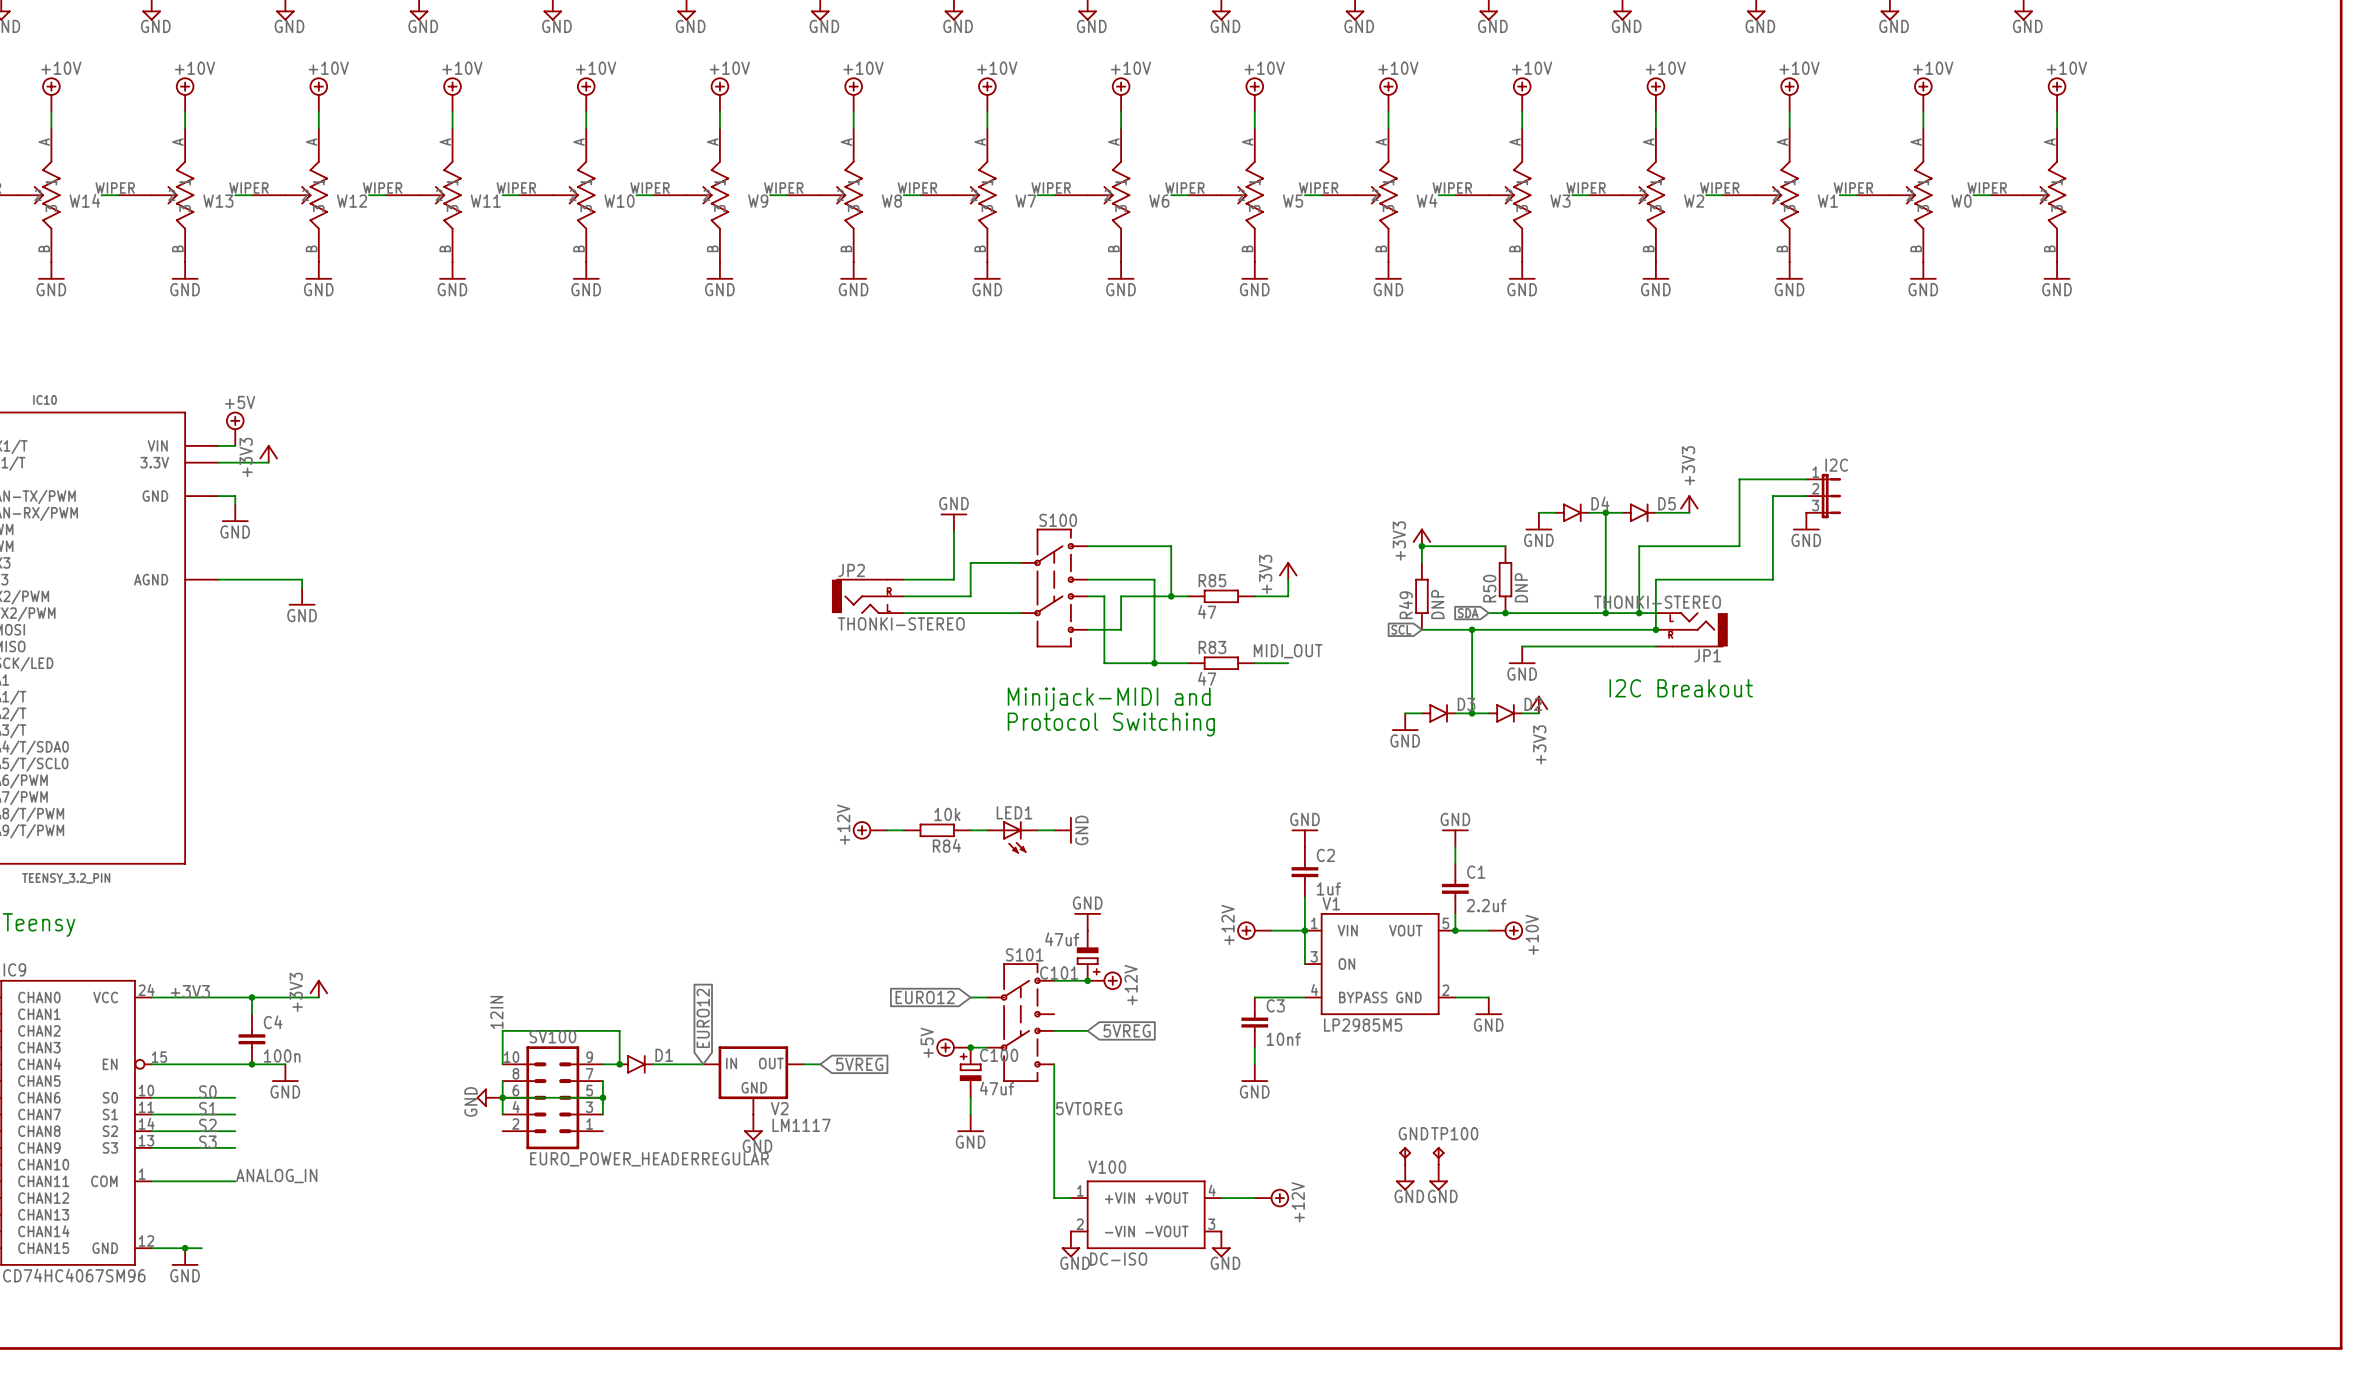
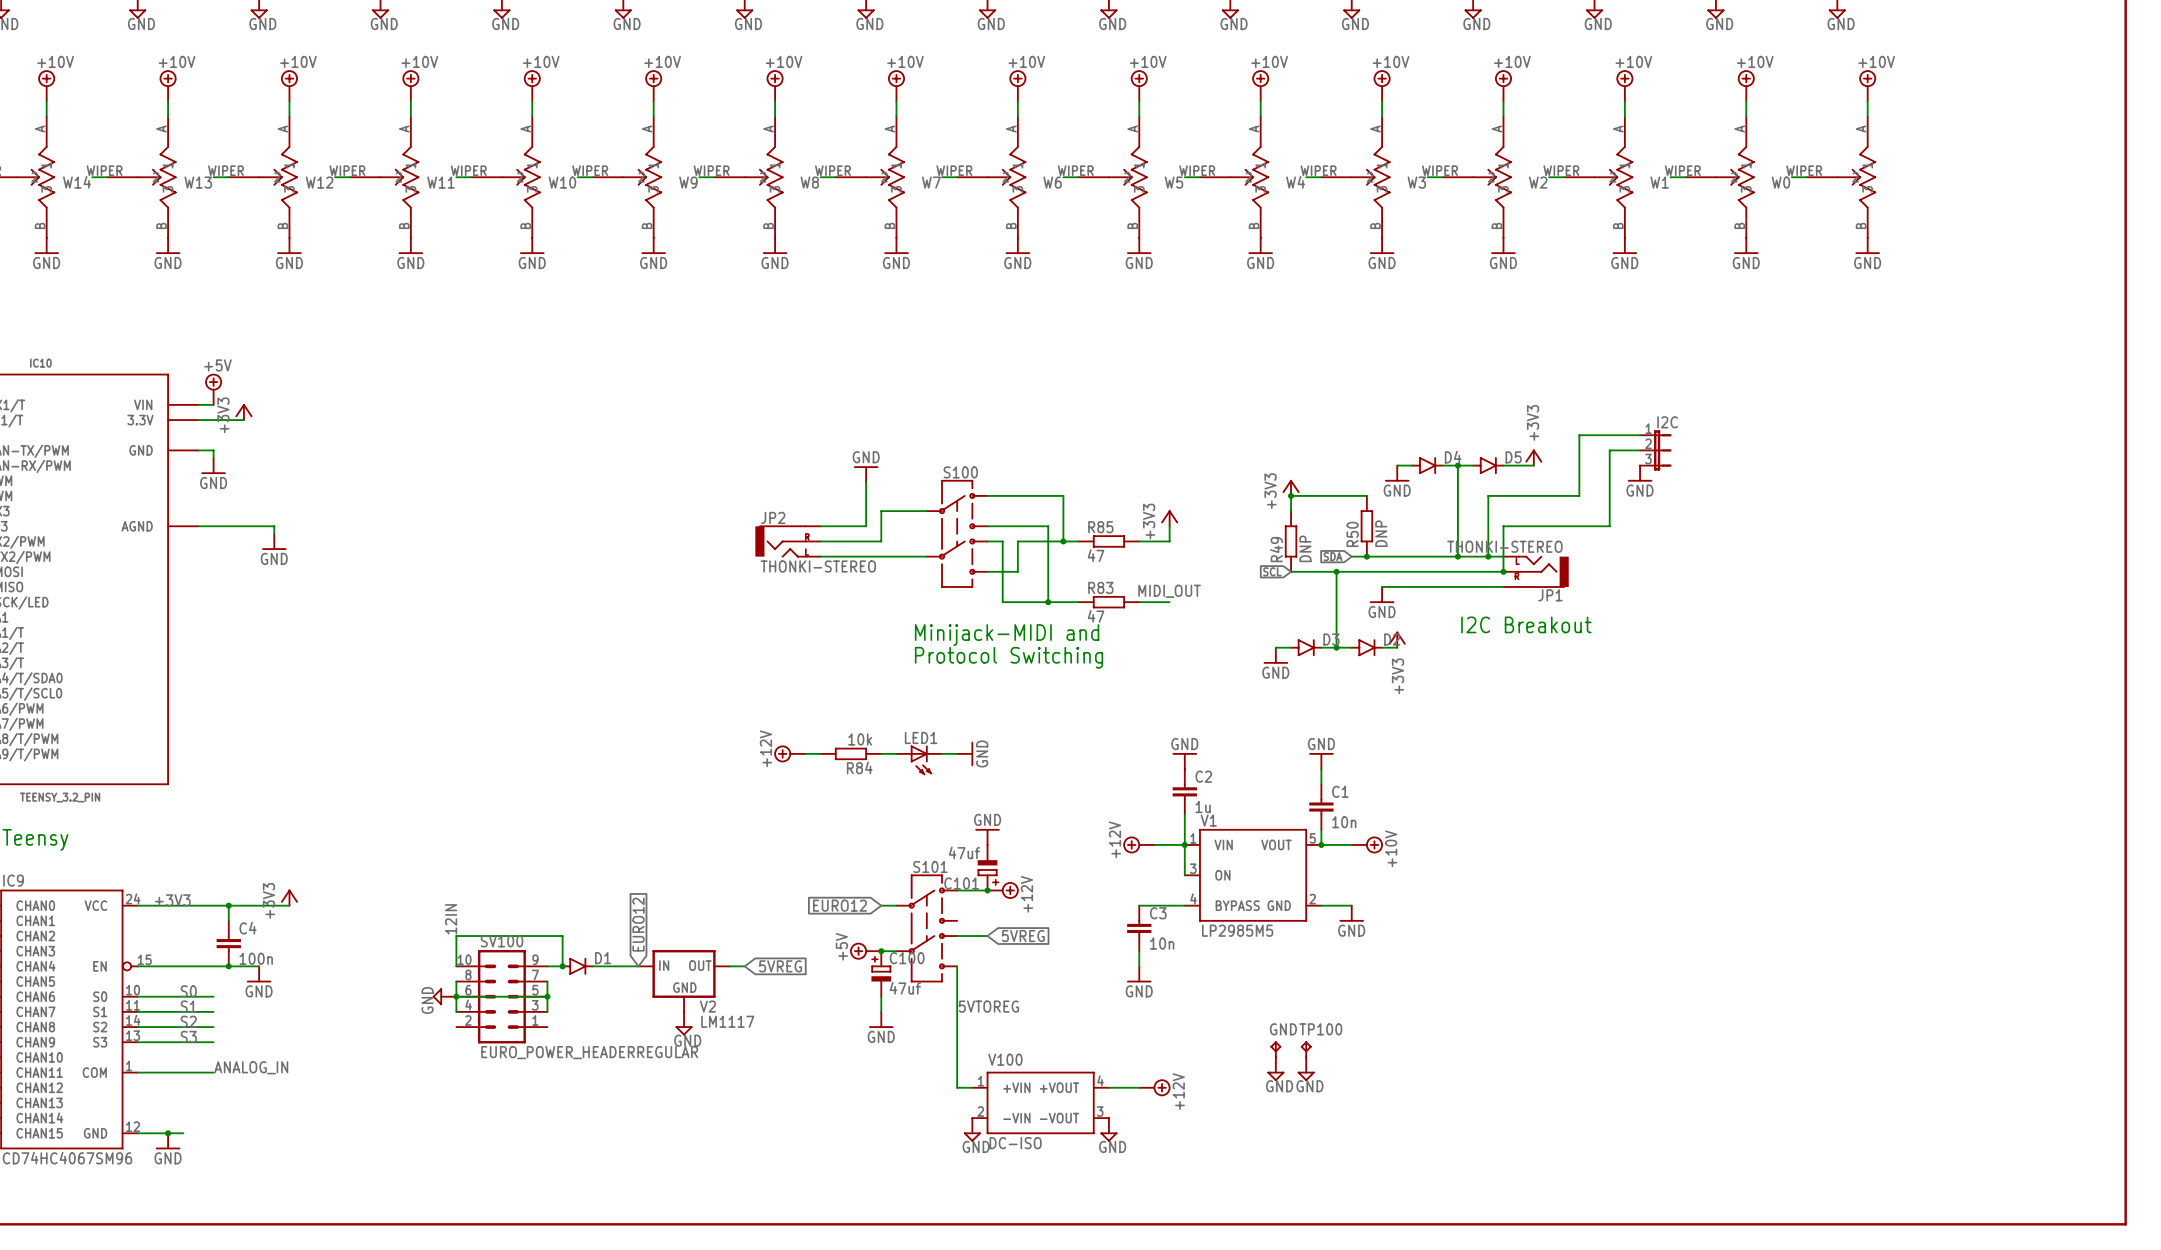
C2 value: 1uf (1328, 888) -> 1u (1203, 807)
C1 value: 2.2uf (1486, 905) -> 10n (1344, 822)
C3 value: 10nf (1283, 1039) -> 10n (1162, 943)

